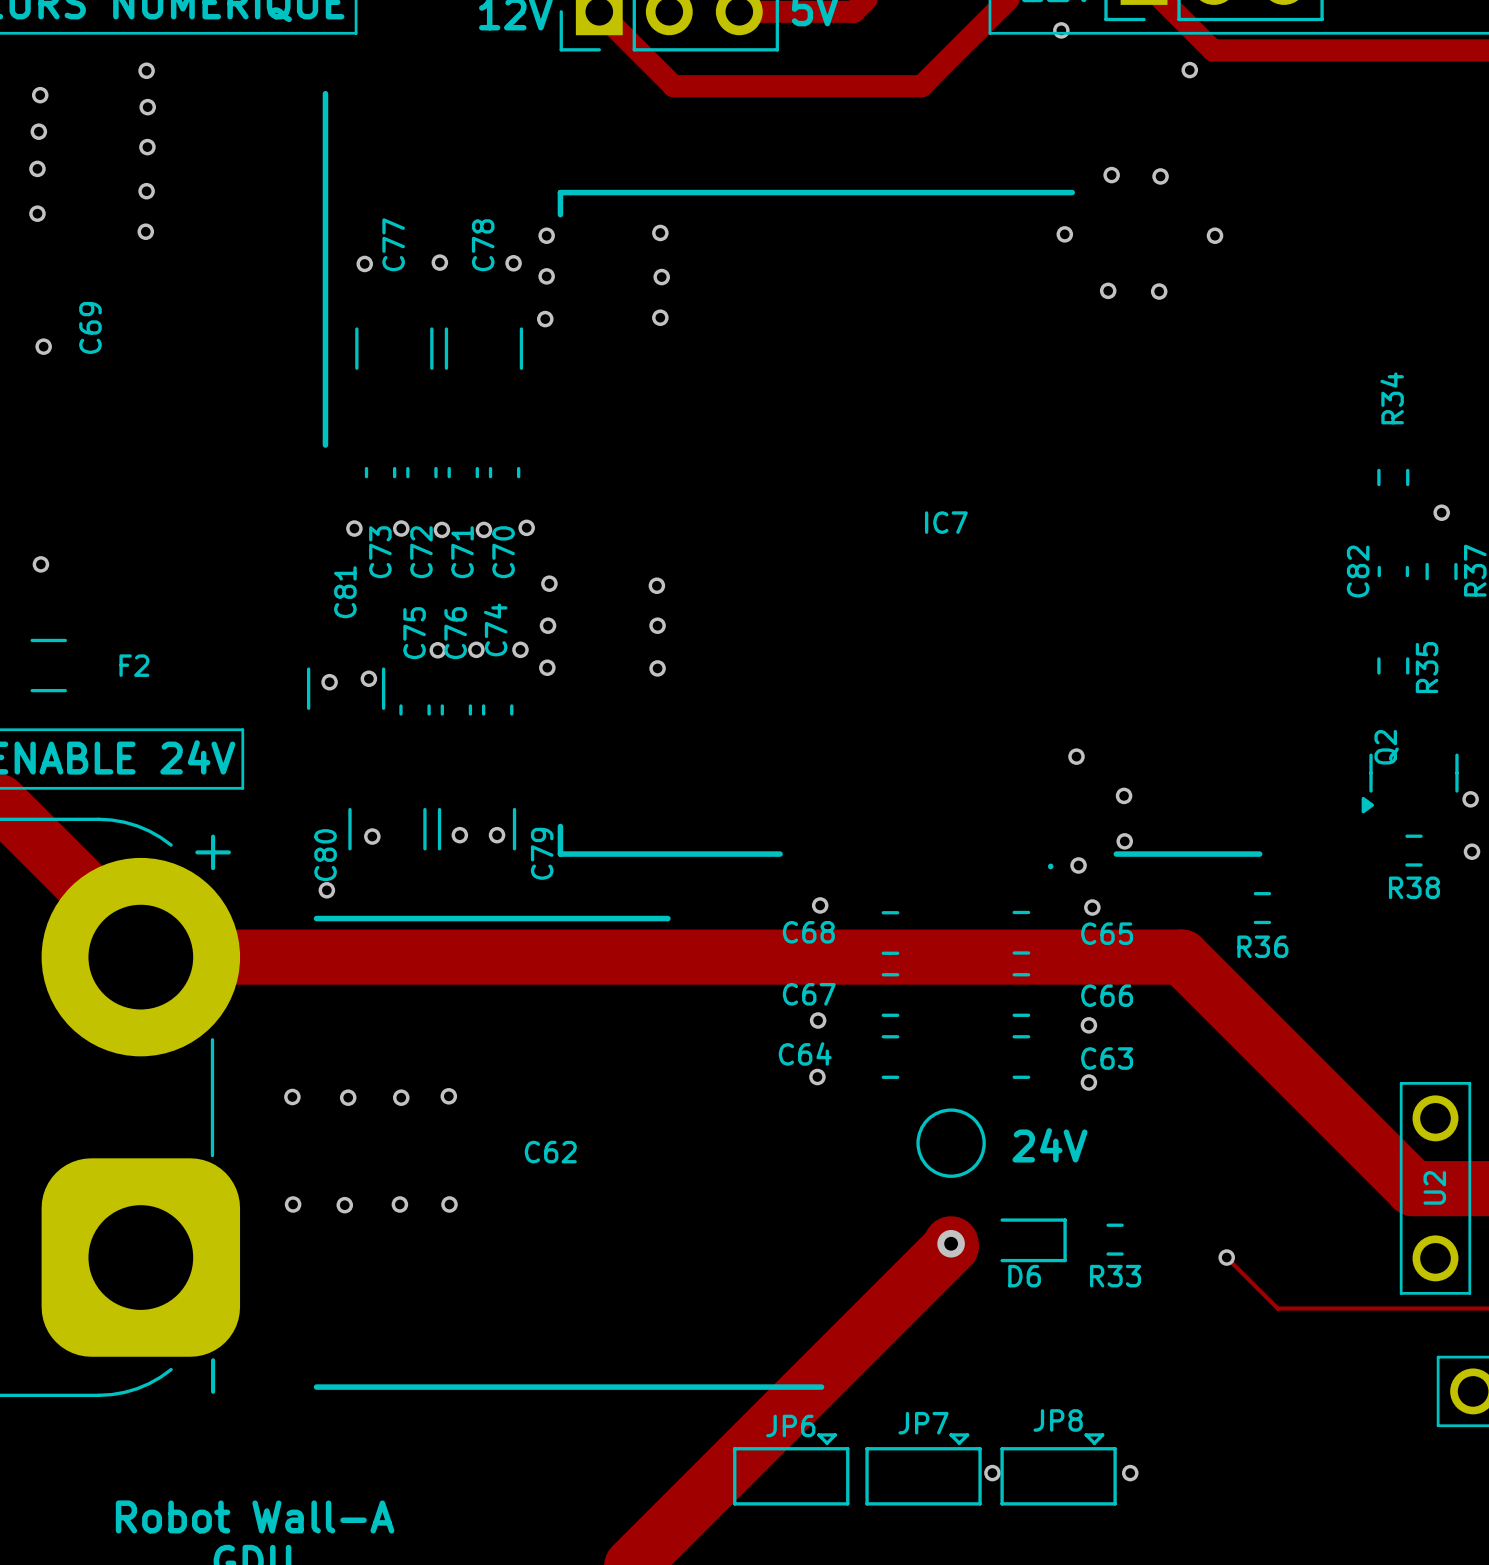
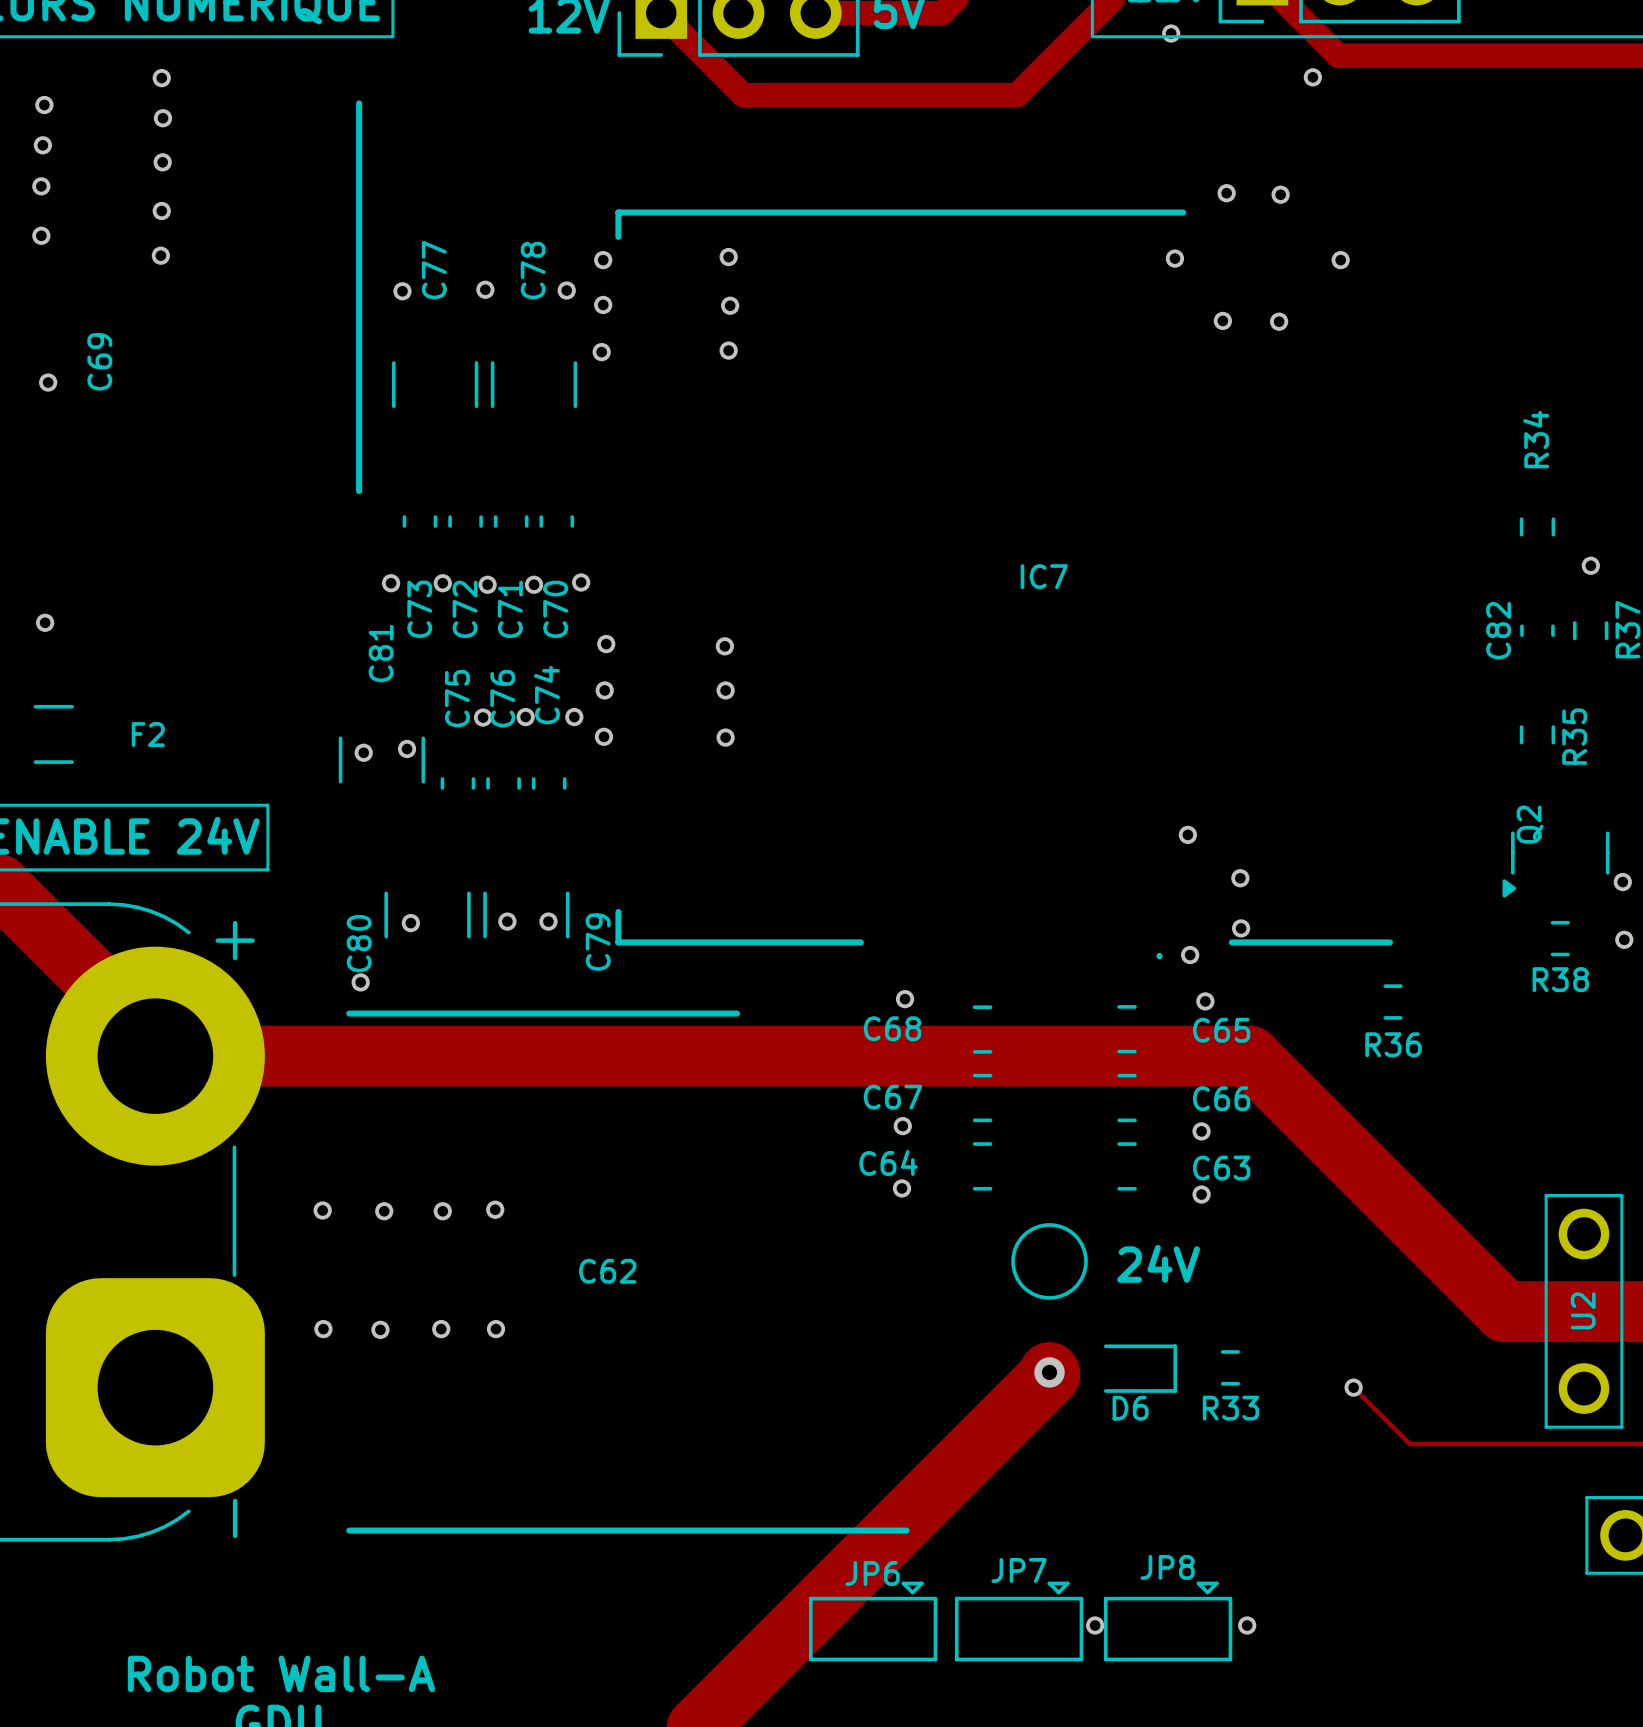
track: (1132, 957) (1181, 957) (1413, 1188) -> (1249, 1056) (1504, 1311) (1559, 1311)

